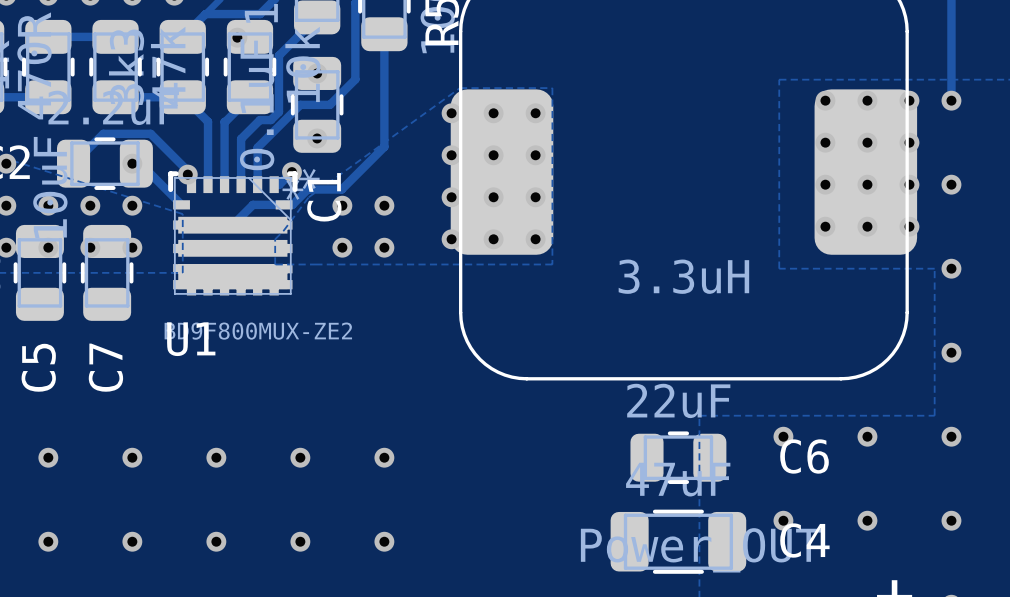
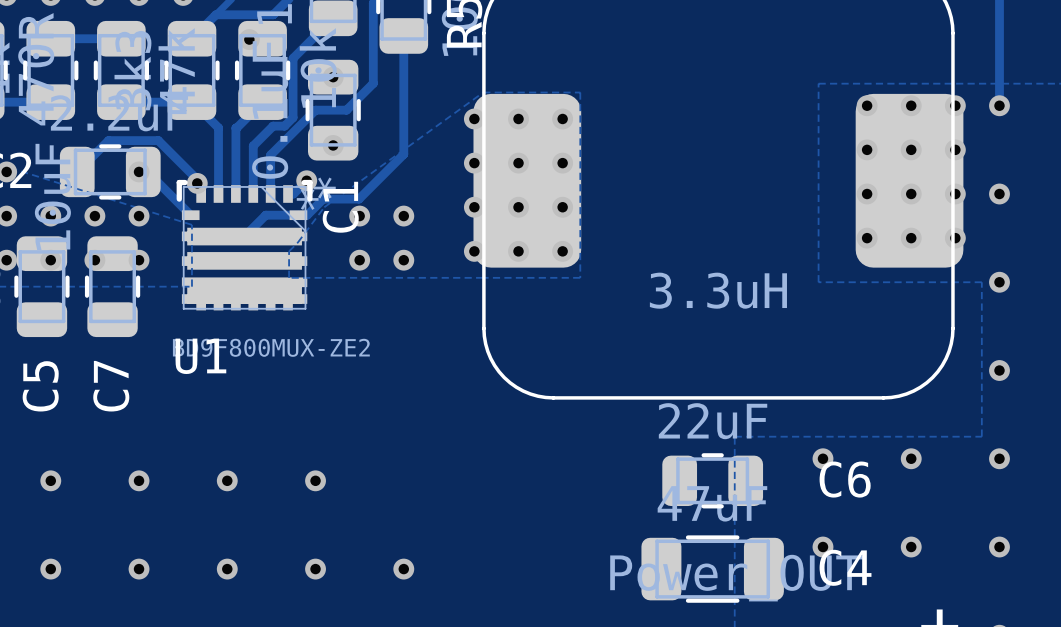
via: (384, 457) -> none

